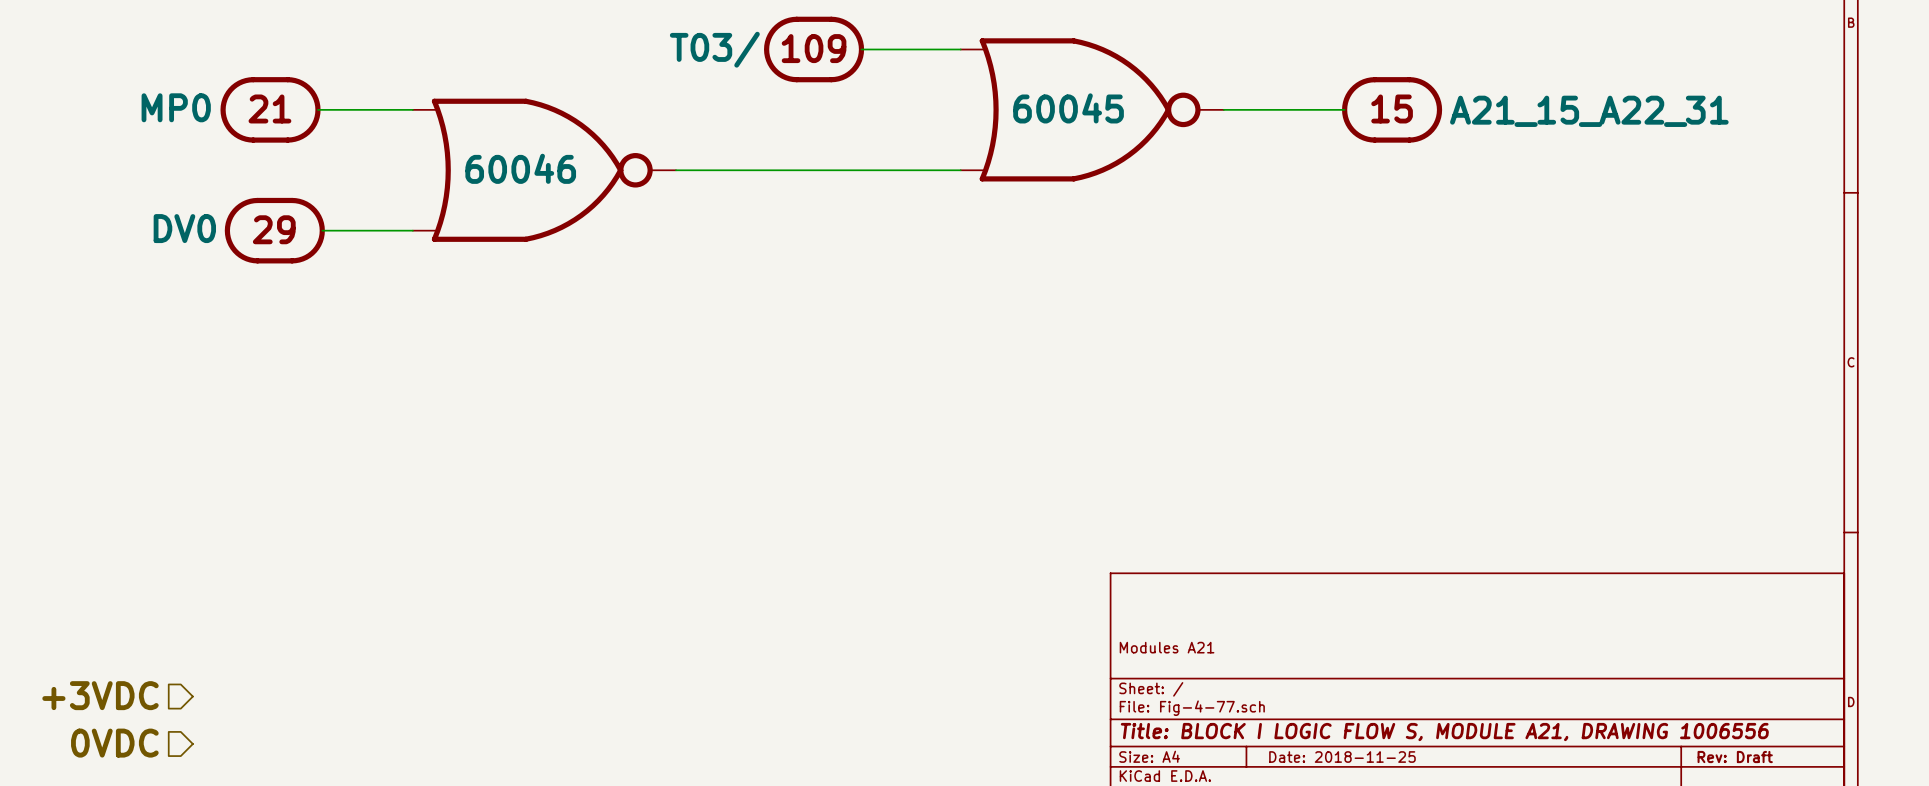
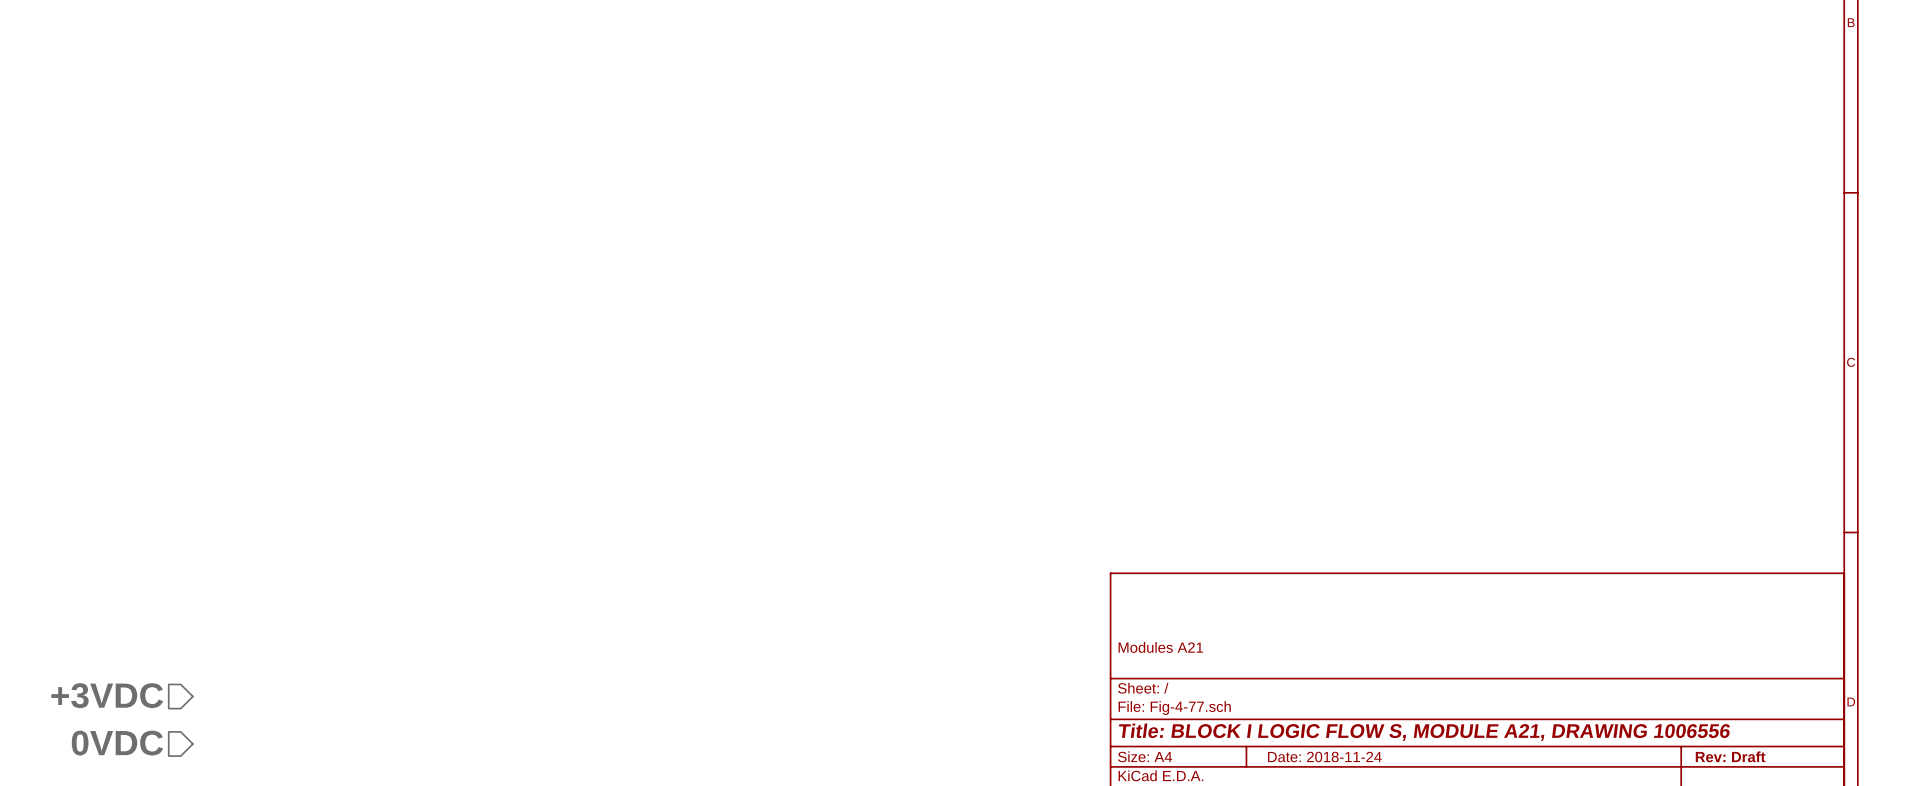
part: (814, 49) -> none
wire: (861, 49) (960, 49) -> none
part: (270, 109) -> none
wire: (317, 109) (412, 109) -> none
part: (1092, 109) -> none
wire: (1223, 109) (1344, 109) -> none
part: (1392, 109) -> none
part: (544, 170) -> none
wire: (676, 170) (960, 170) -> none
part: (274, 230) -> none
wire: (322, 230) (412, 230) -> none
title block: Date: 2018-11-25 (1342, 757) -> Date: 2018-11-24 (1324, 757)

